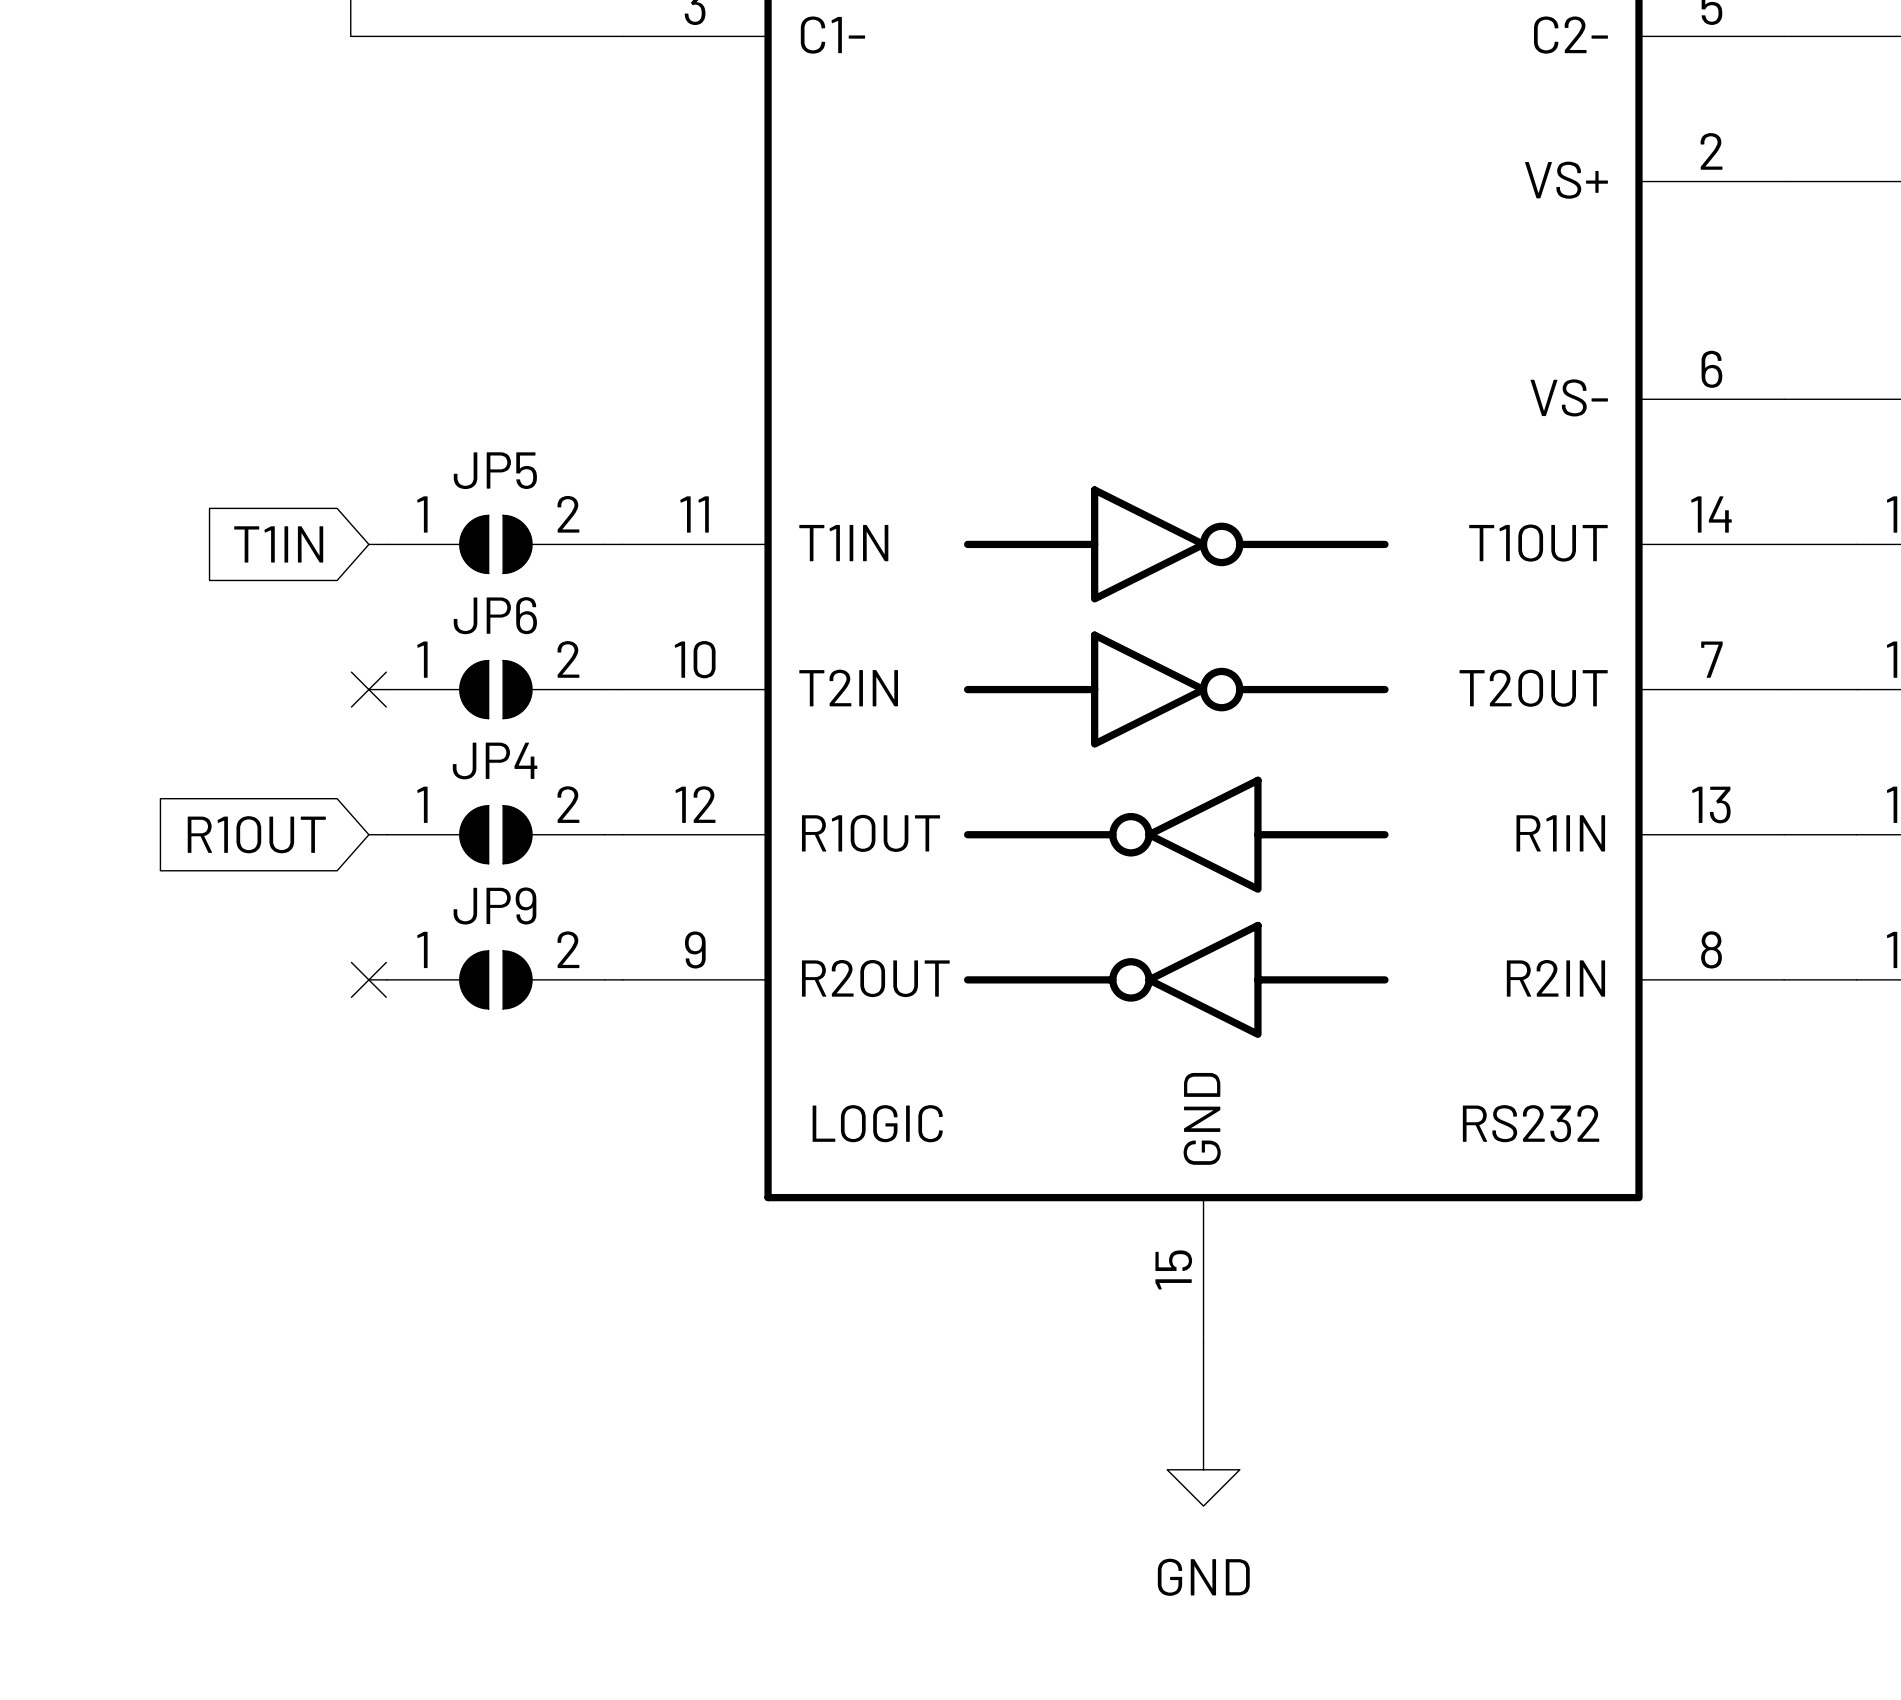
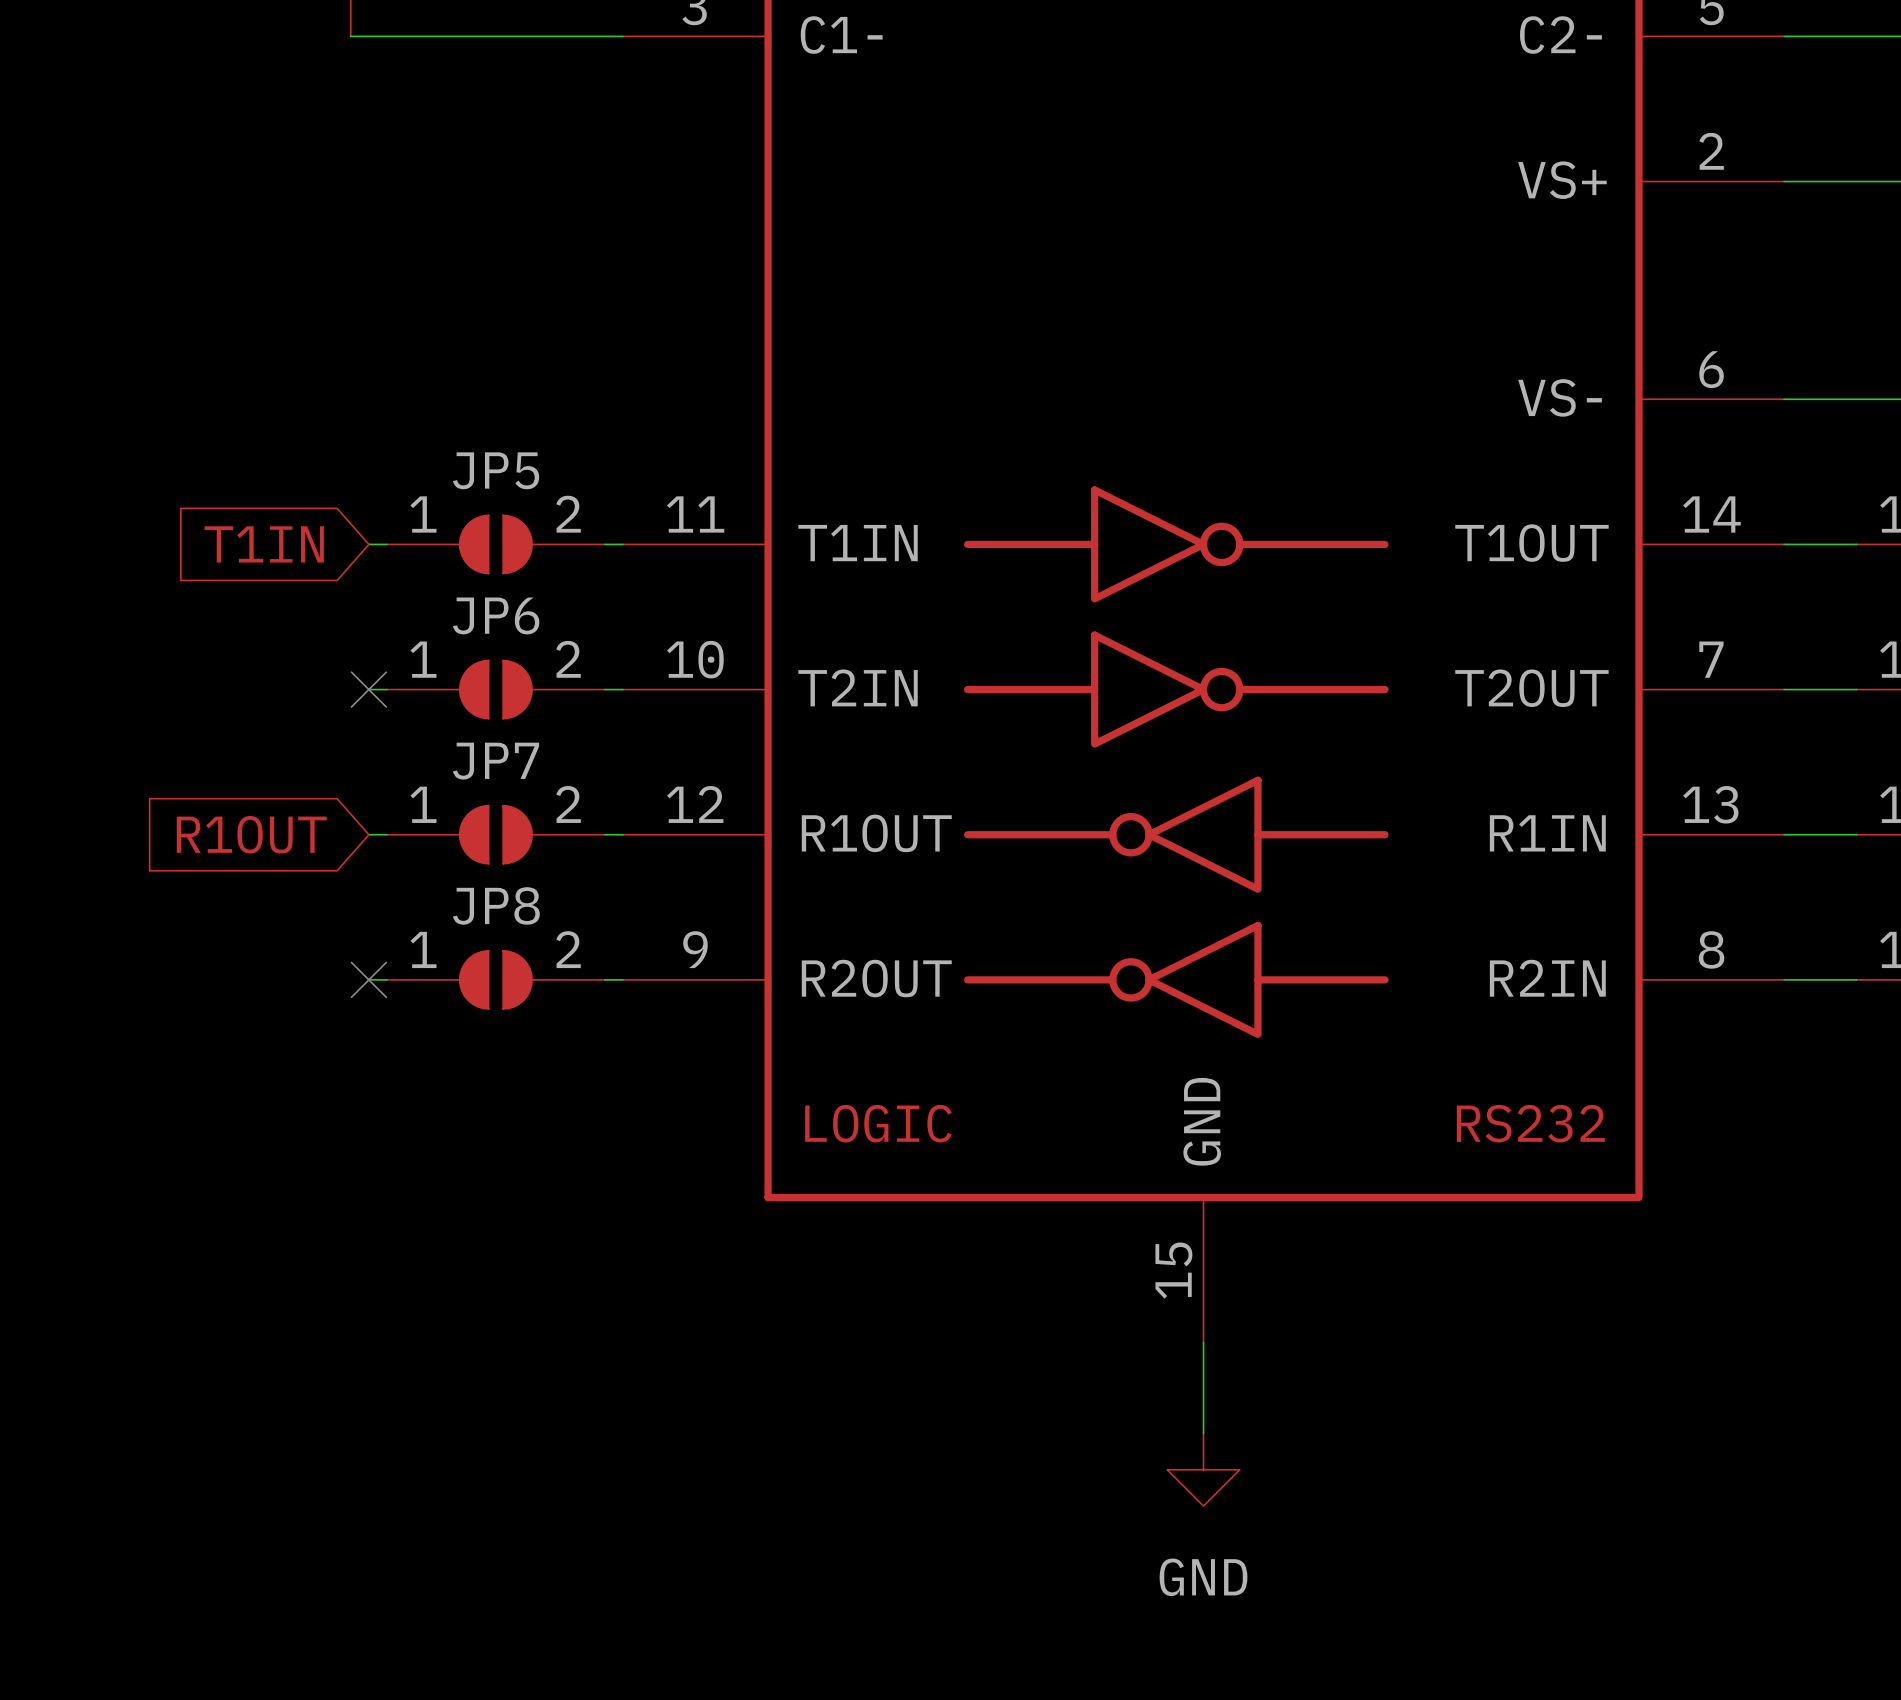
JP4 name: JP4 (495, 760) -> JP7 (496, 761)
JP9 name: JP9 (494, 905) -> JP8 (496, 905)

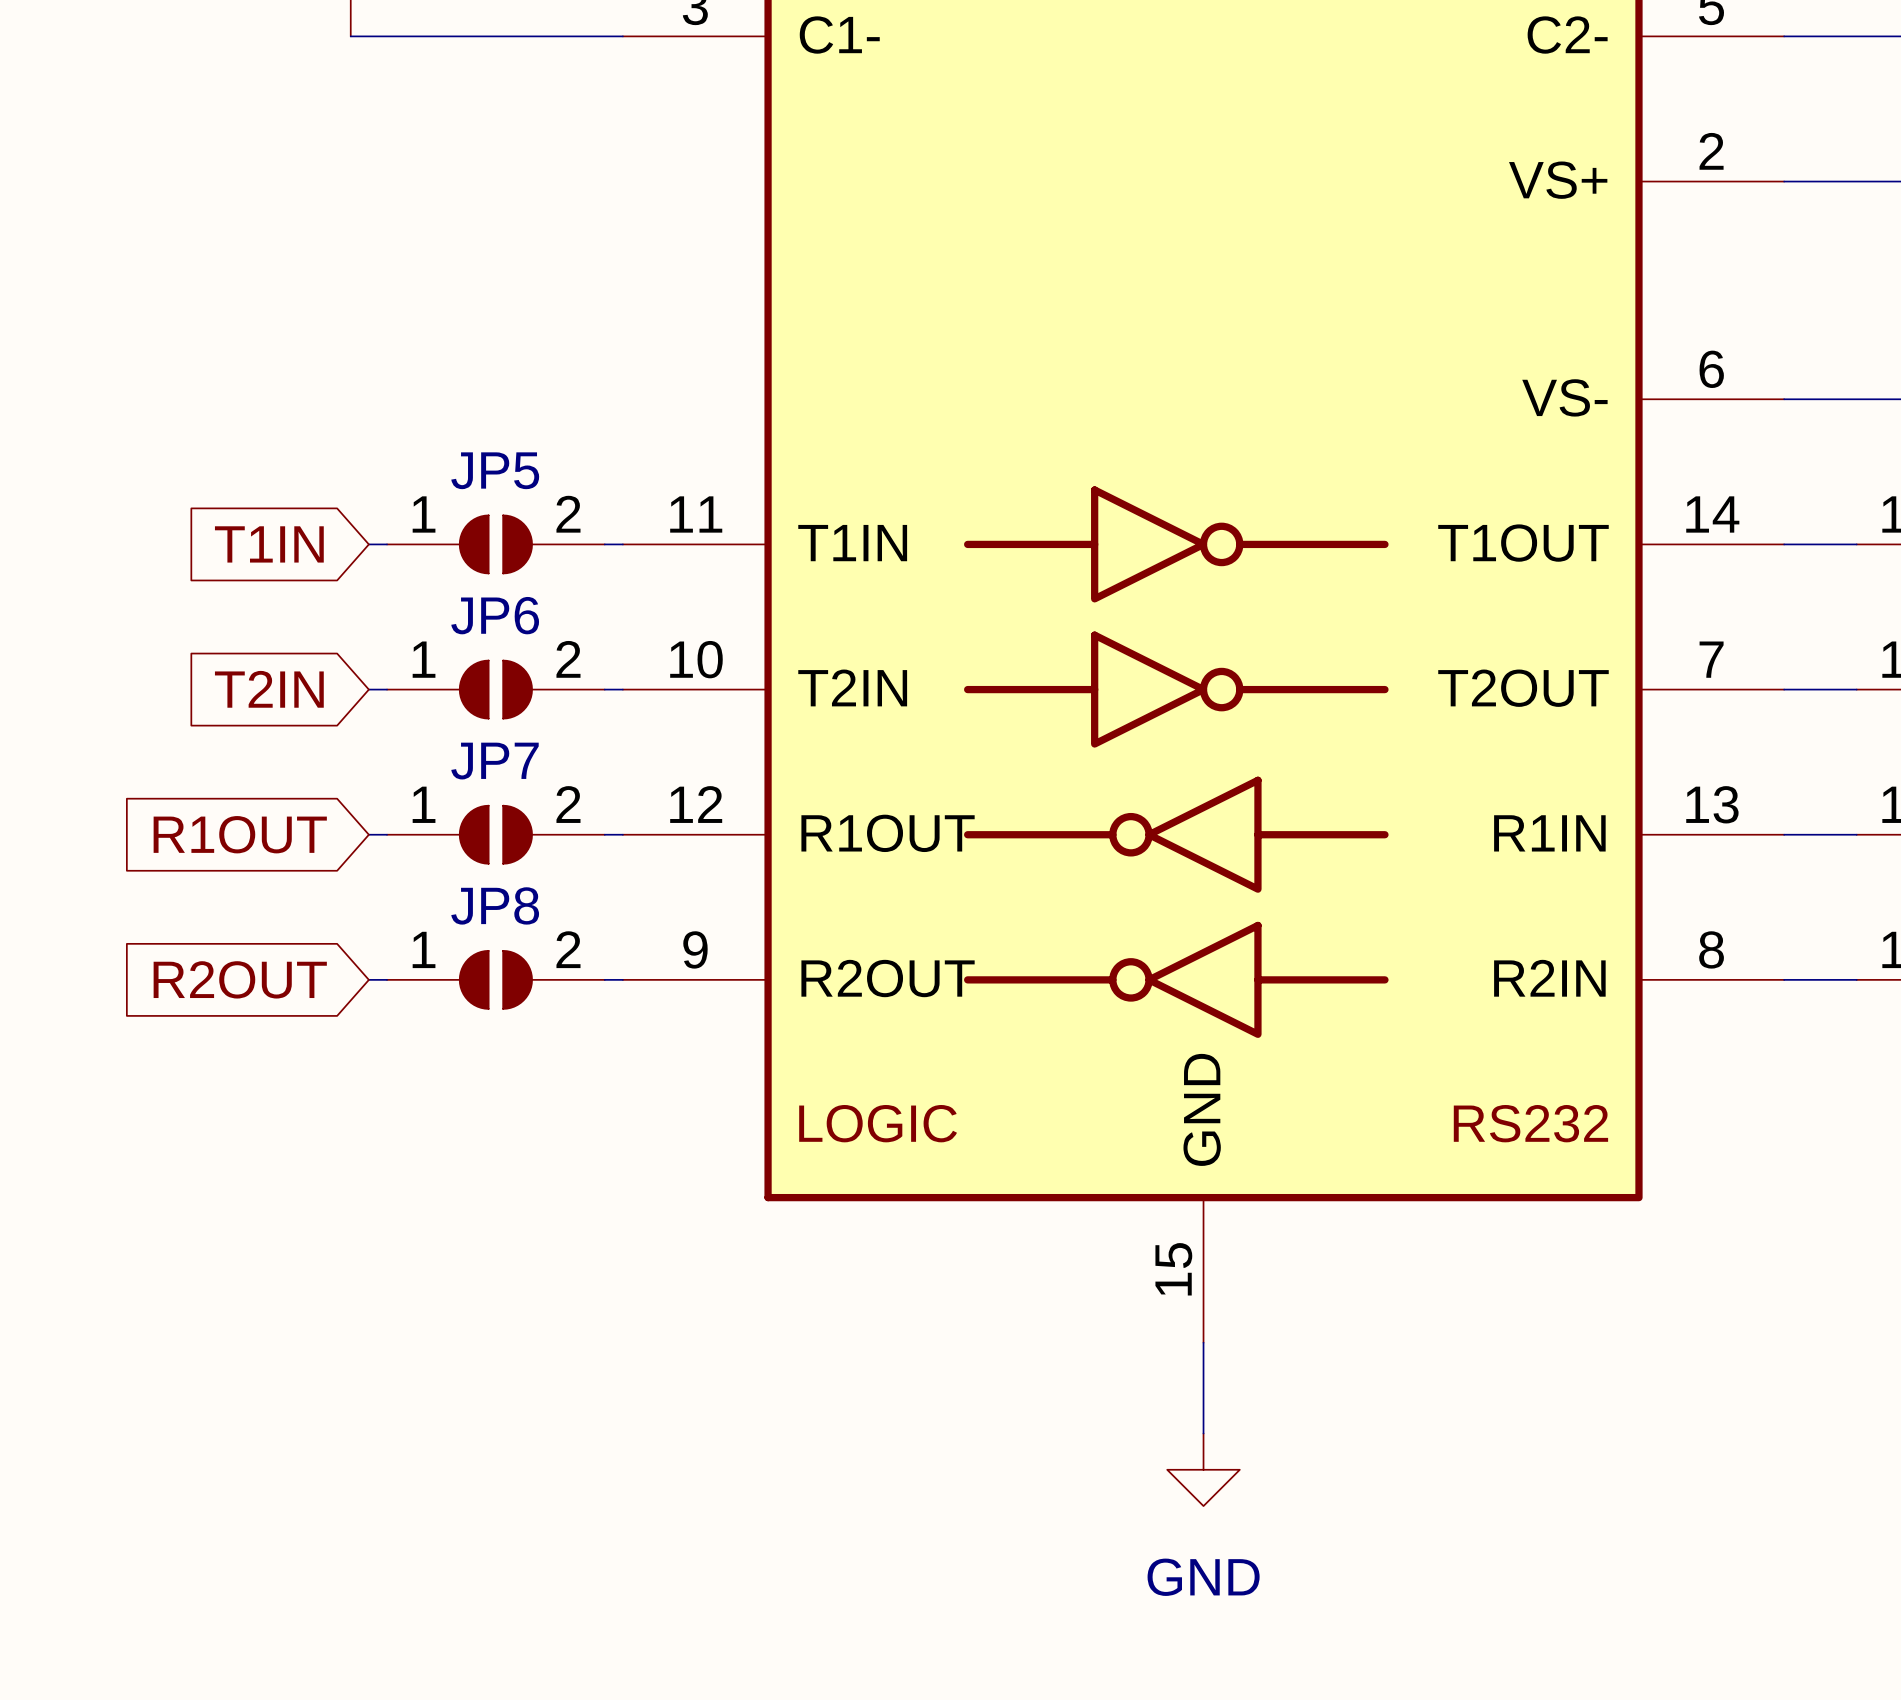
global label: none -> T2IN (269, 689)
no-connect mark: (368, 689) -> none
global label: none -> R2OUT (240, 979)
no-connect mark: (368, 979) -> none

